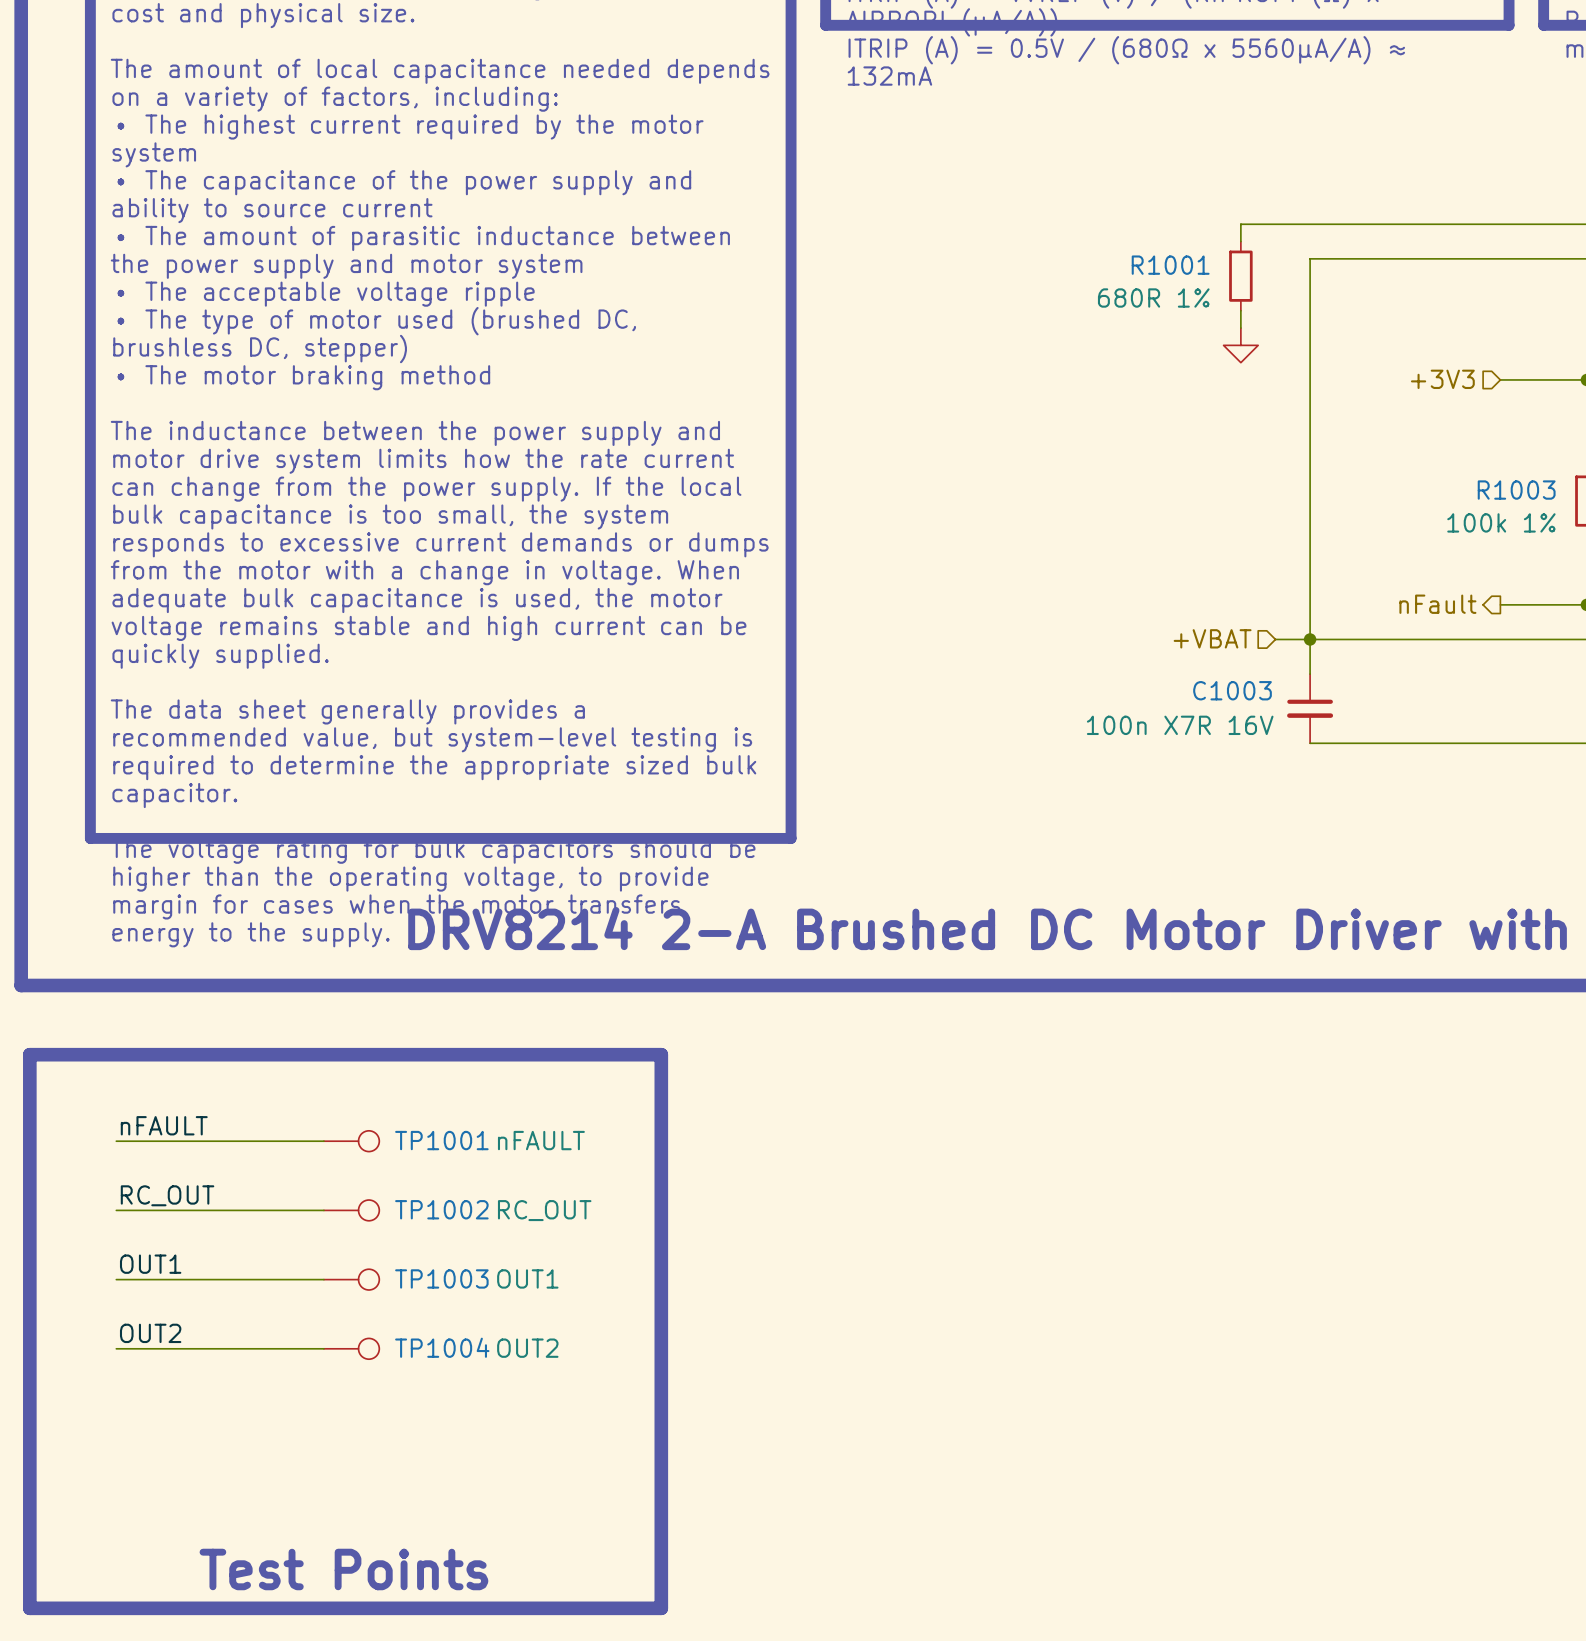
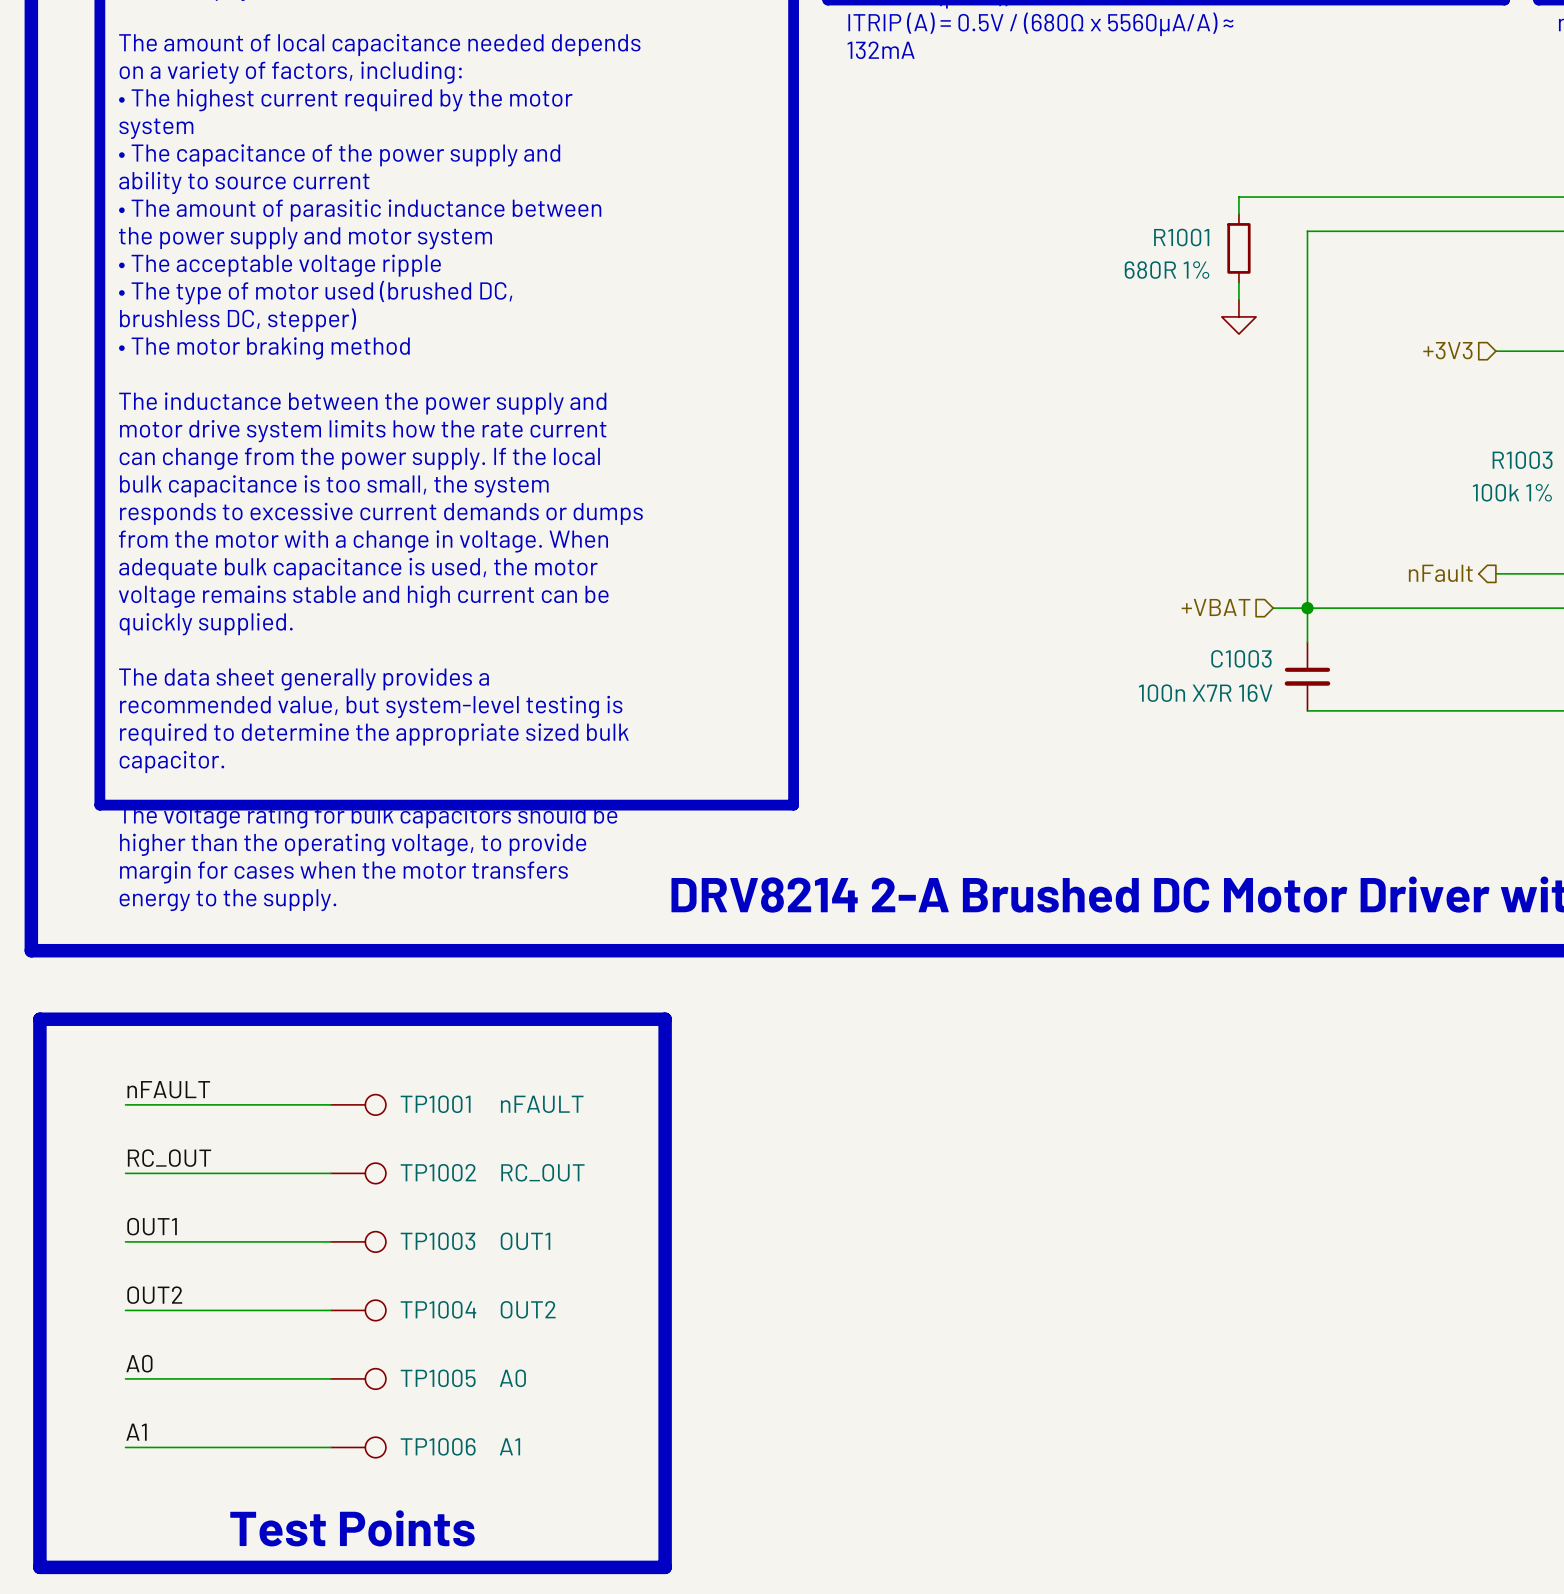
label: none -> A0 (139, 1363)
wire: none -> (125, 1378) (331, 1378)
TP1005: none -> A0 (358, 1378)
label: none -> A1 (136, 1432)
wire: none -> (125, 1447) (331, 1447)
TP1006: none -> A1 (358, 1447)

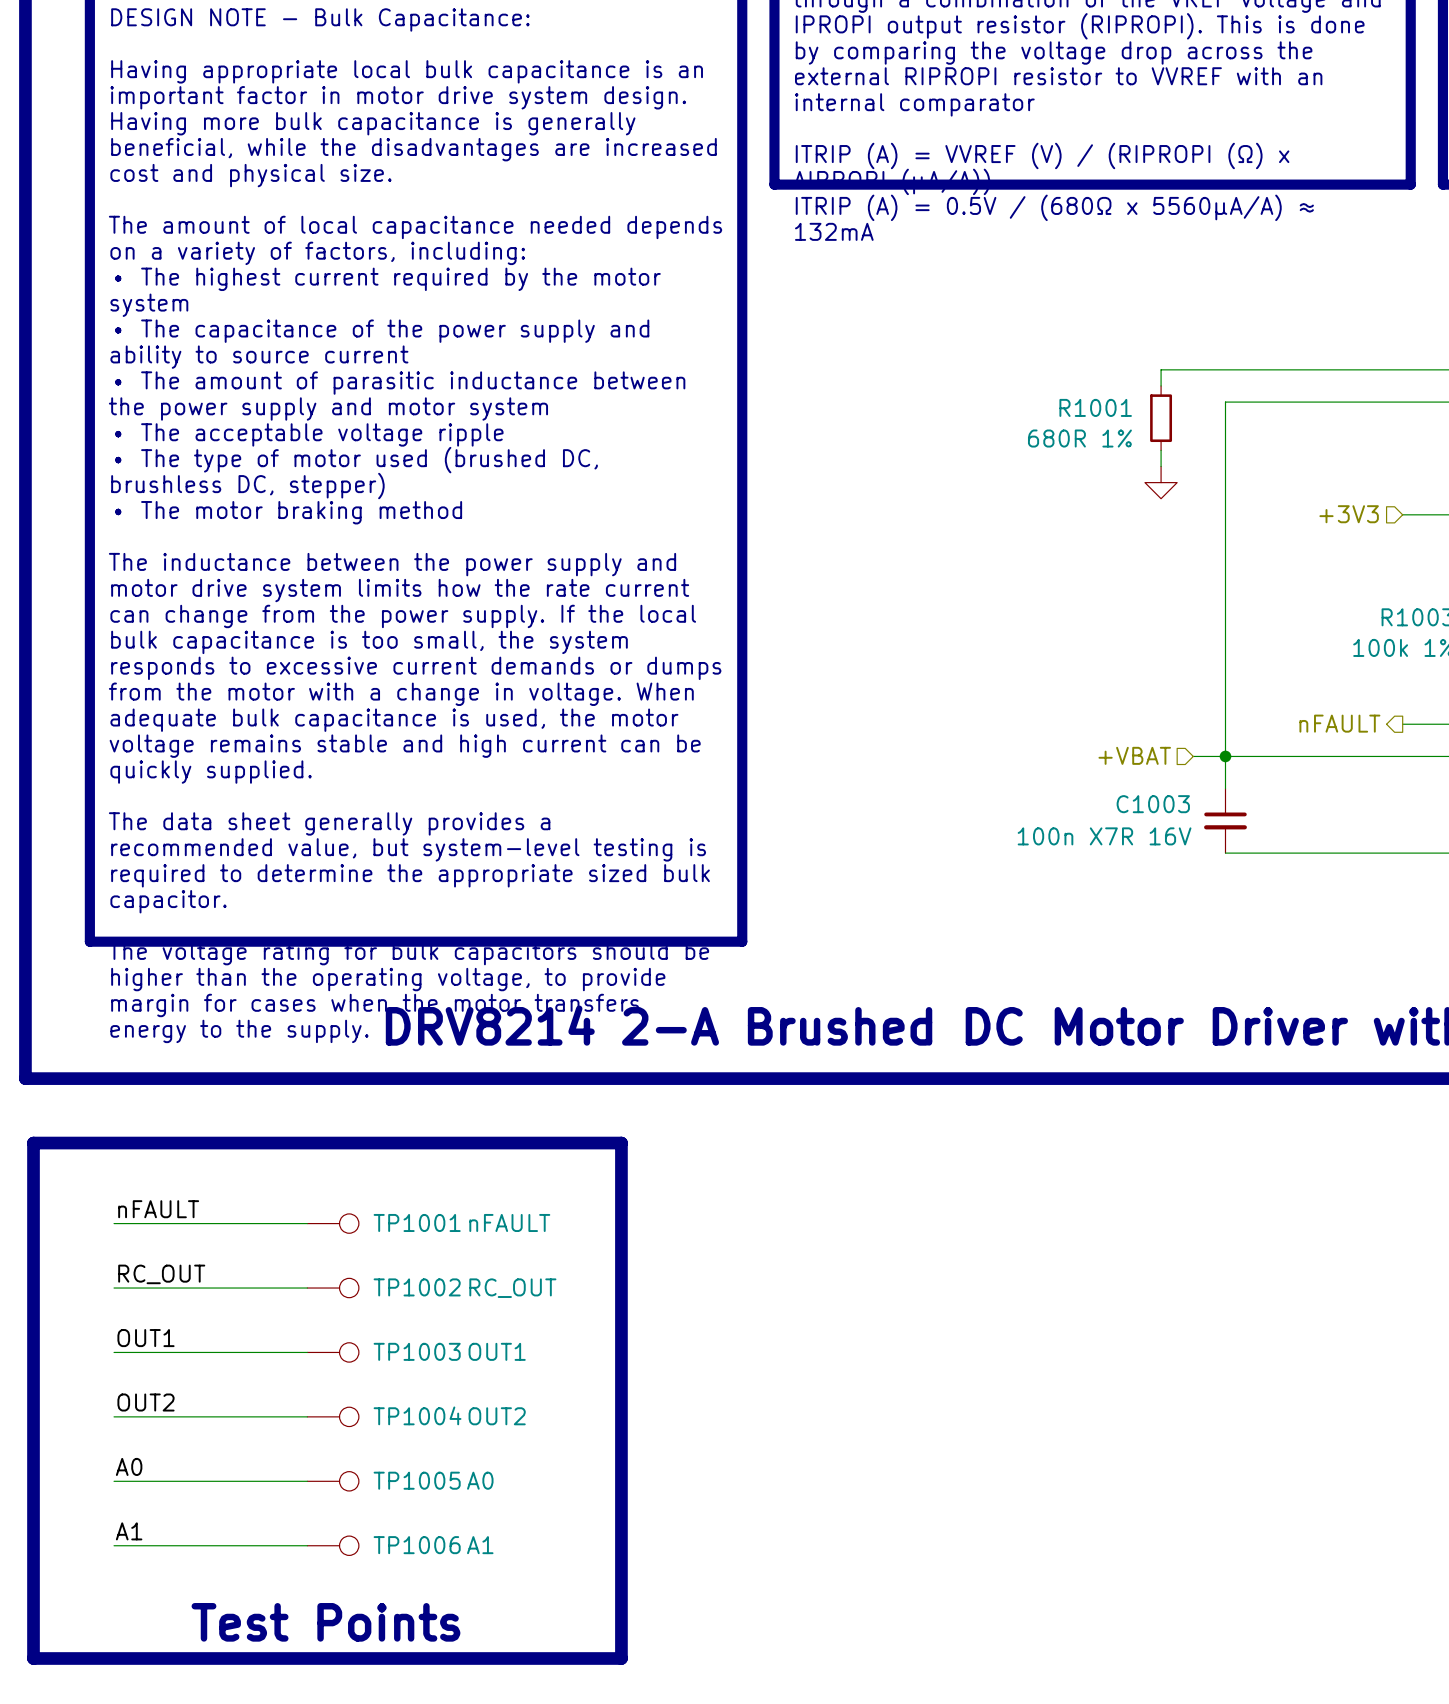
hierarchical label: nFault (1440, 573) -> nFAULT (1339, 723)

